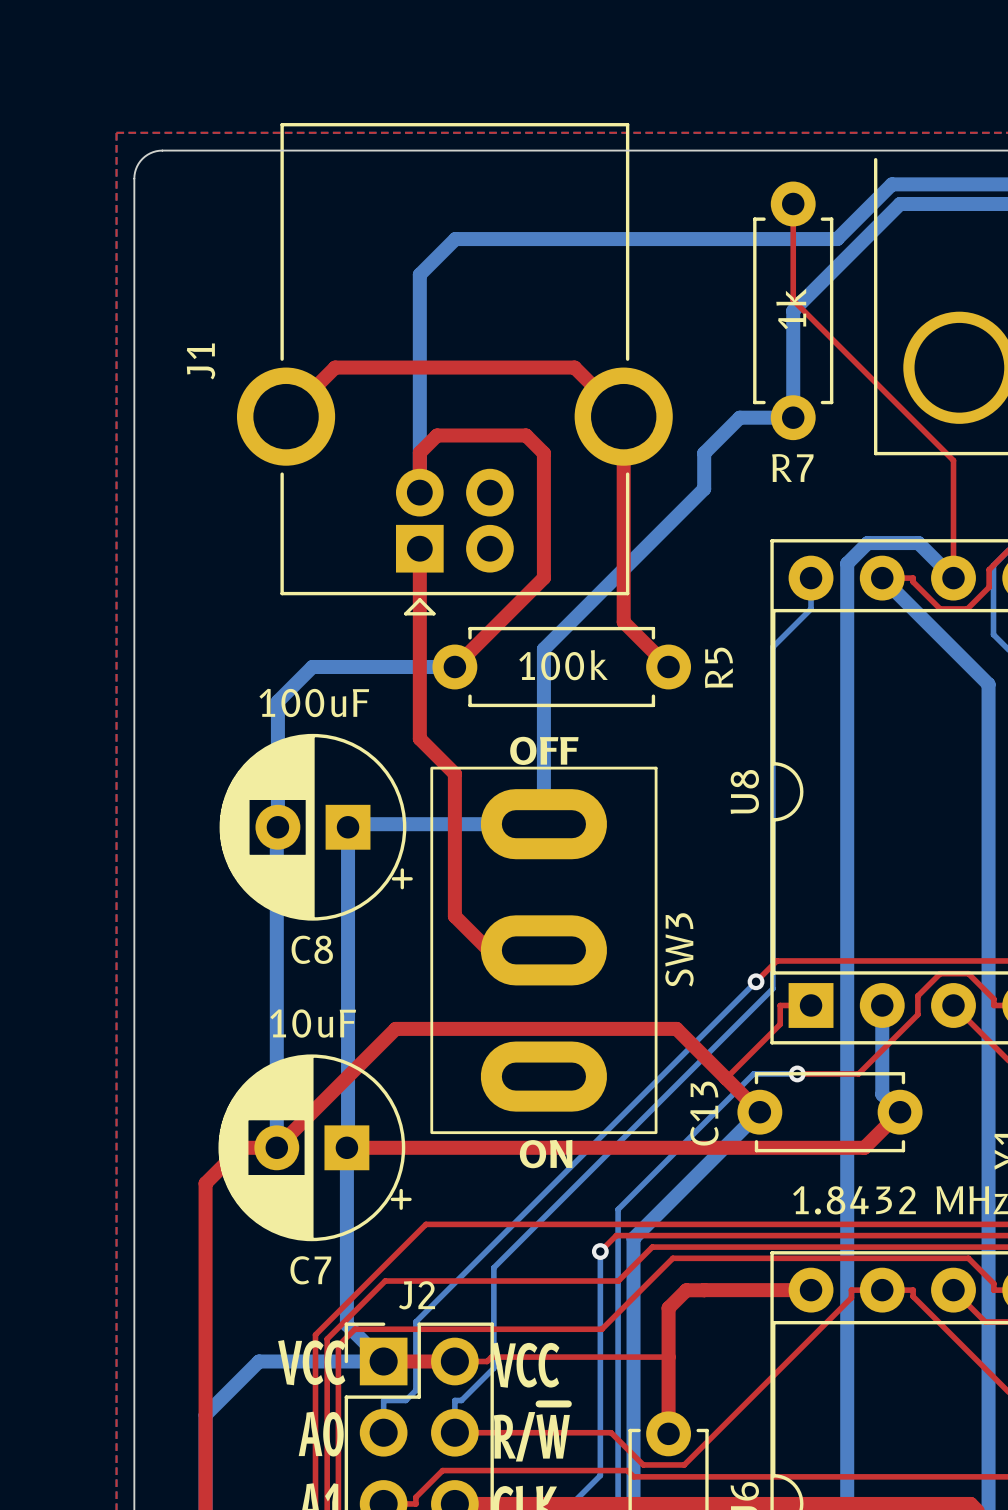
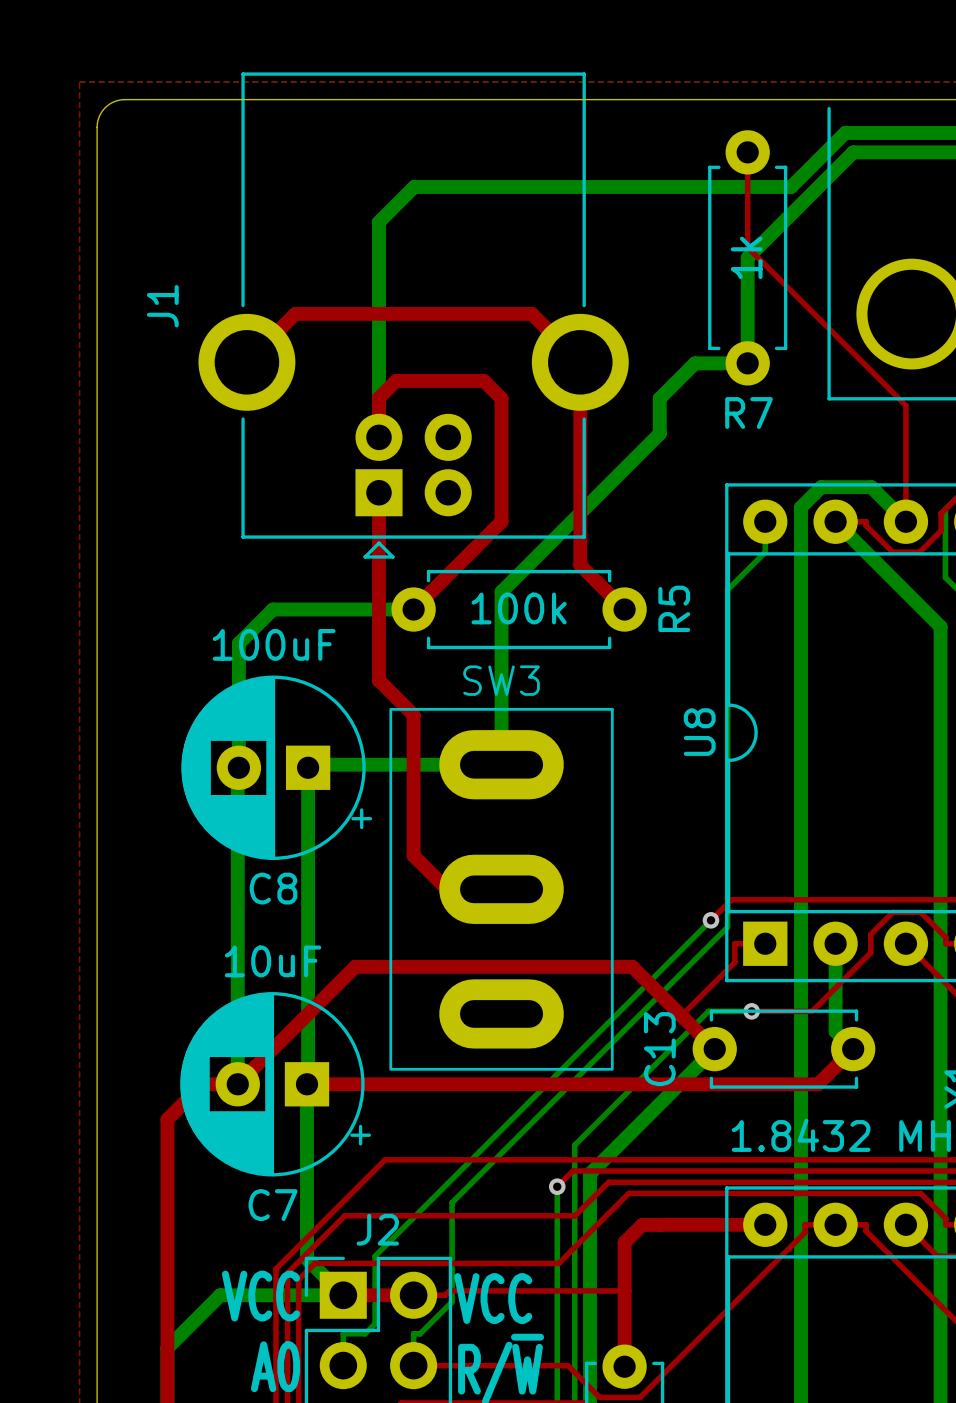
text: OFF (544, 750) -> none
SW3 name rotation: 0° (679, 949) -> 90° clockwise (501, 680)
SW3 name position: SW3 (679, 949) -> SW3 (501, 680)
text: ON (546, 1154) -> none

